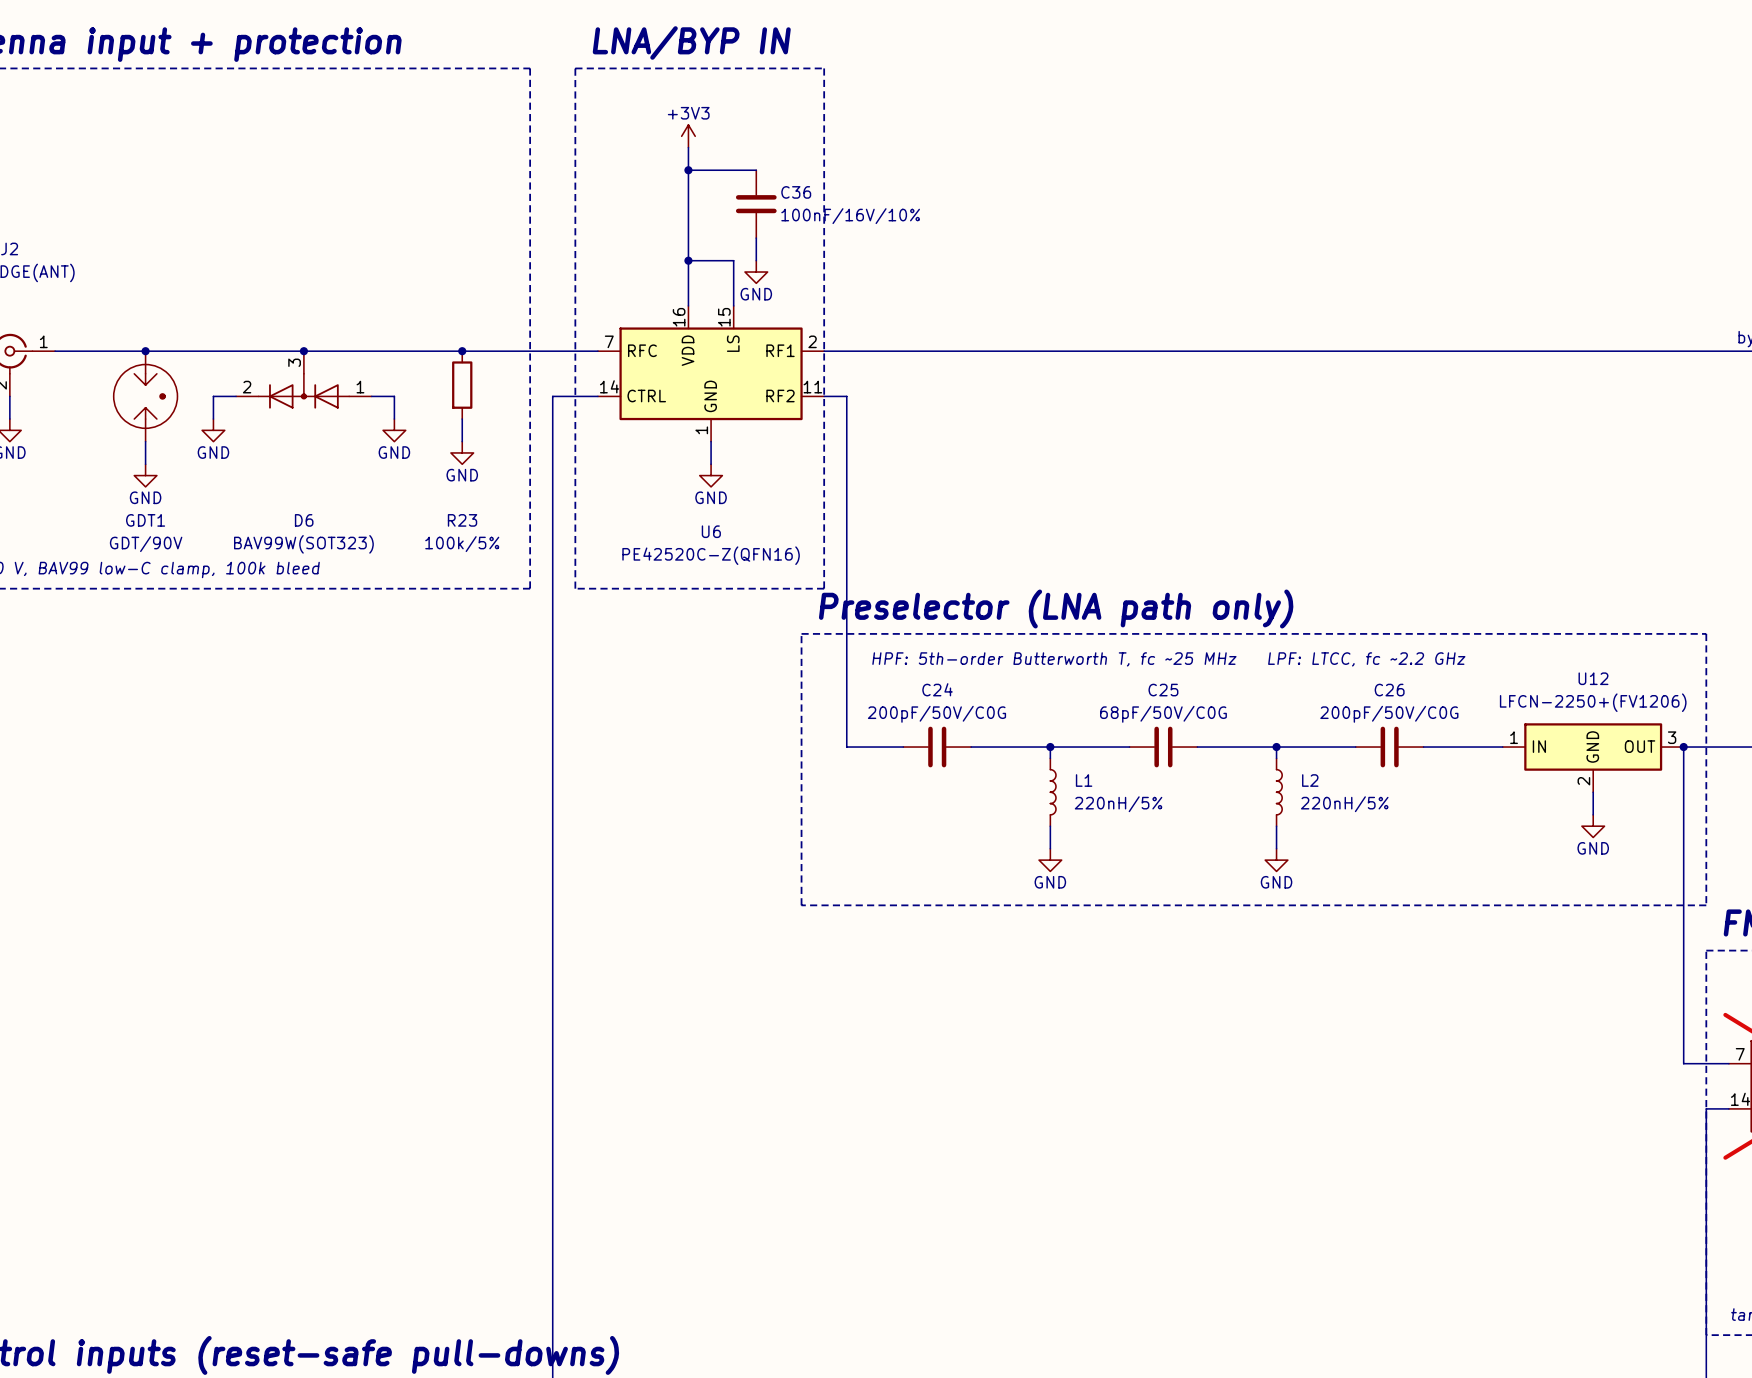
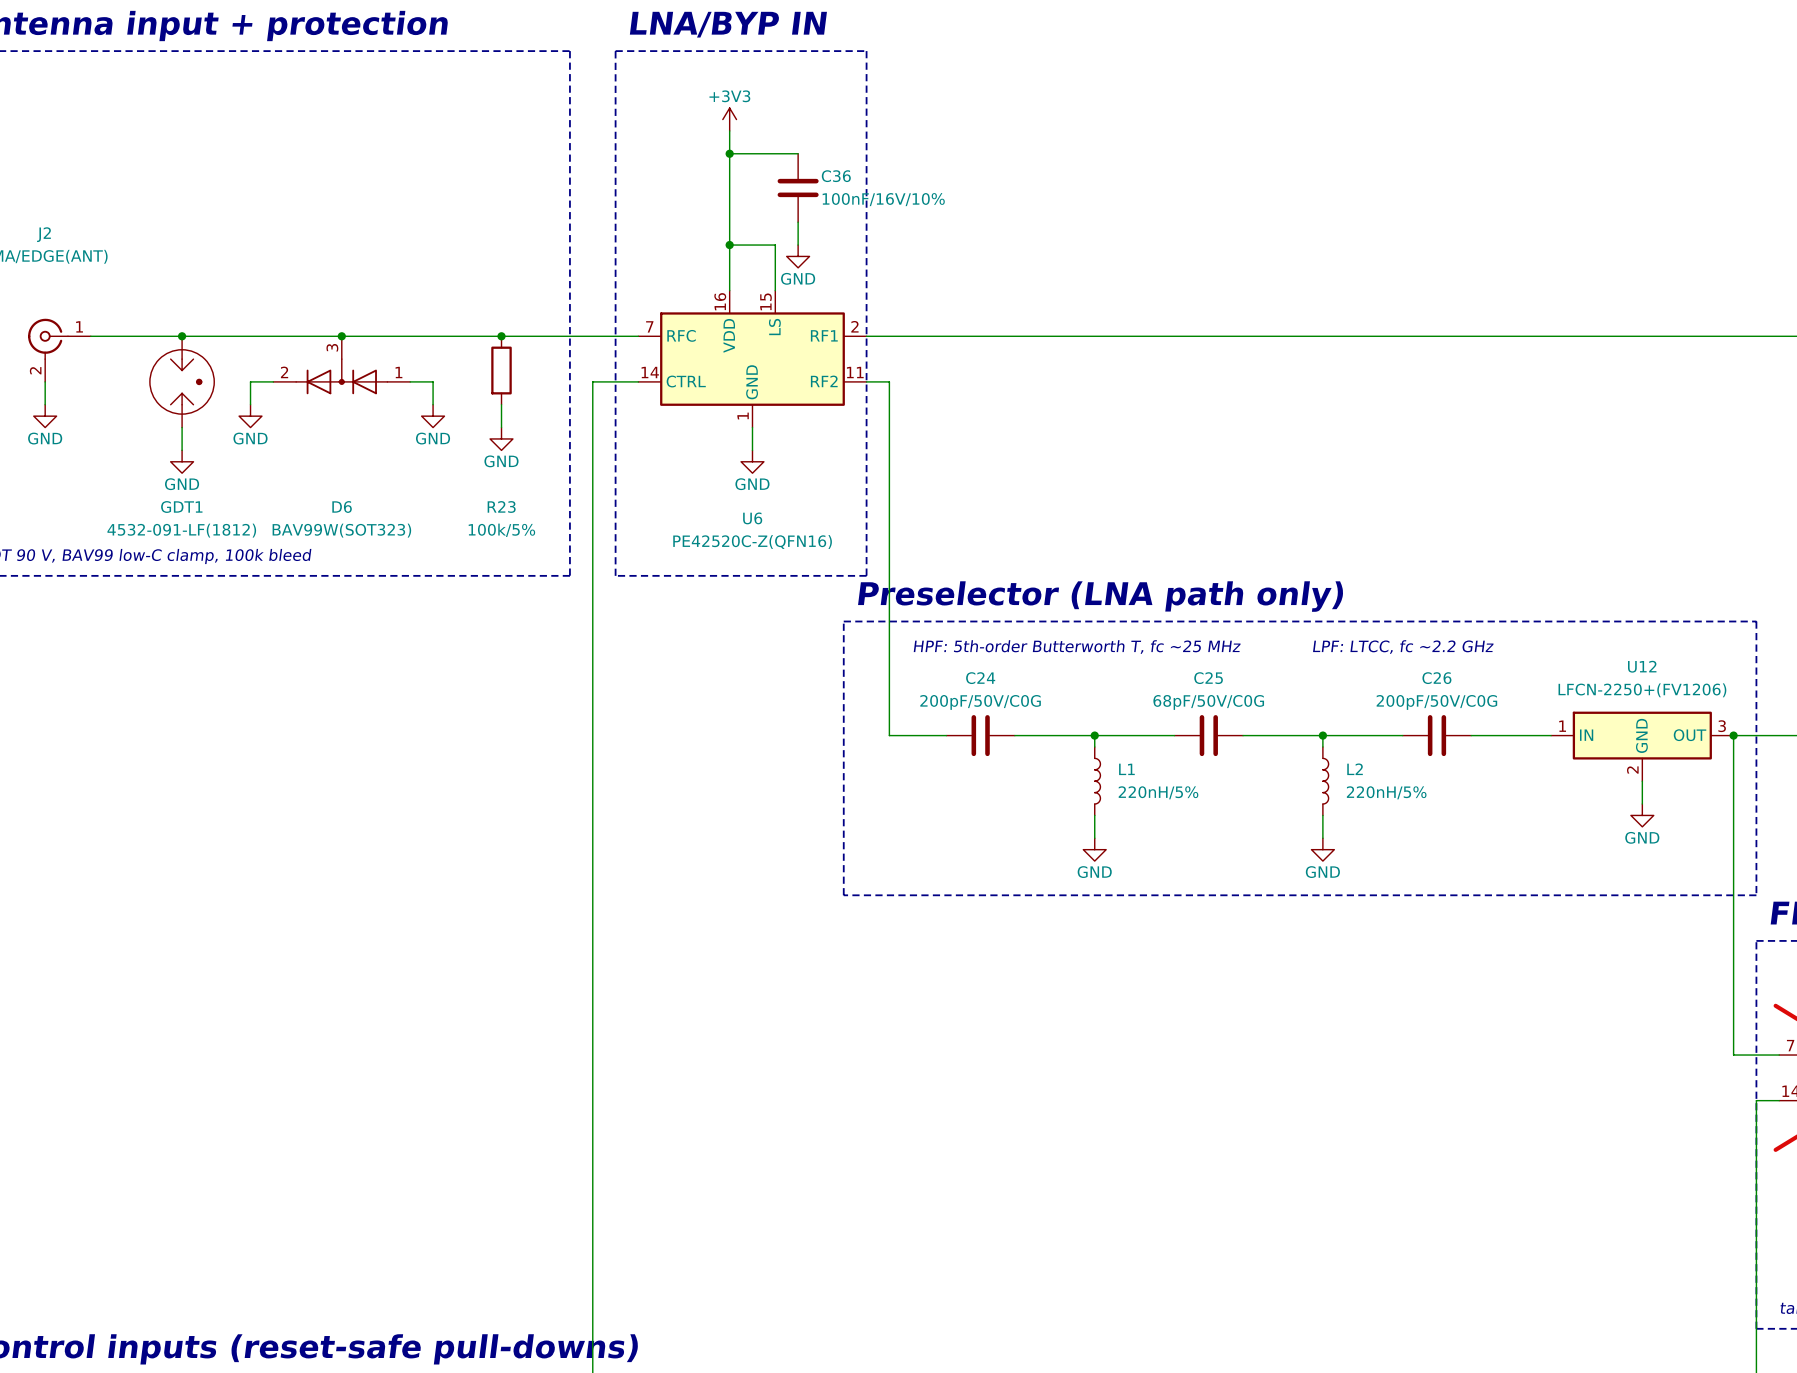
GDT1 value: GDT/90V (146, 544) -> 4532-091-LF(1812) (181, 530)

